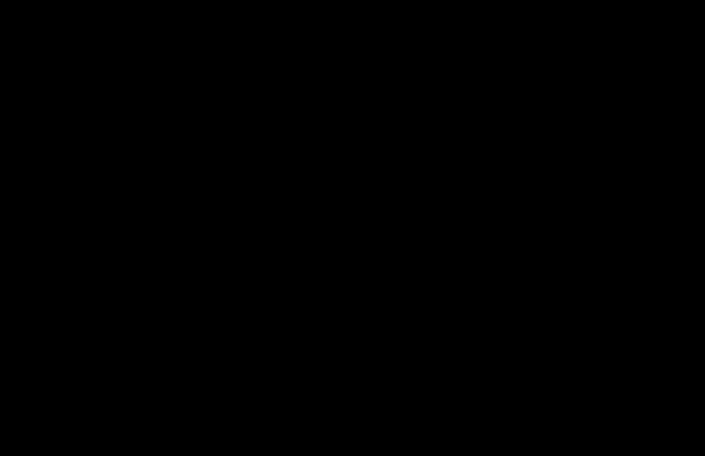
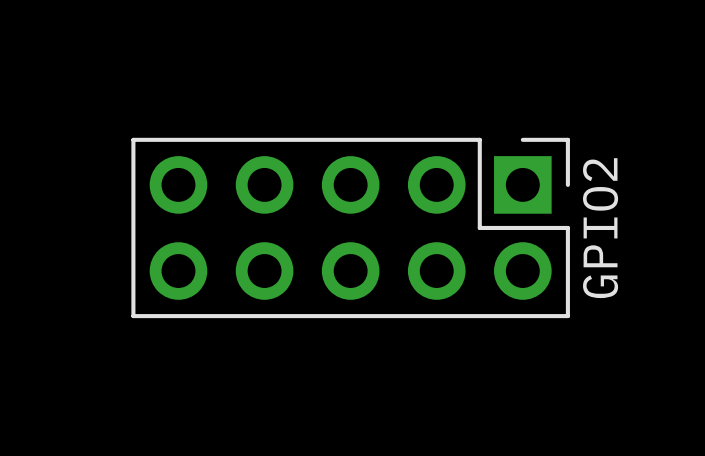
GPIO2: none -> (350, 227)

